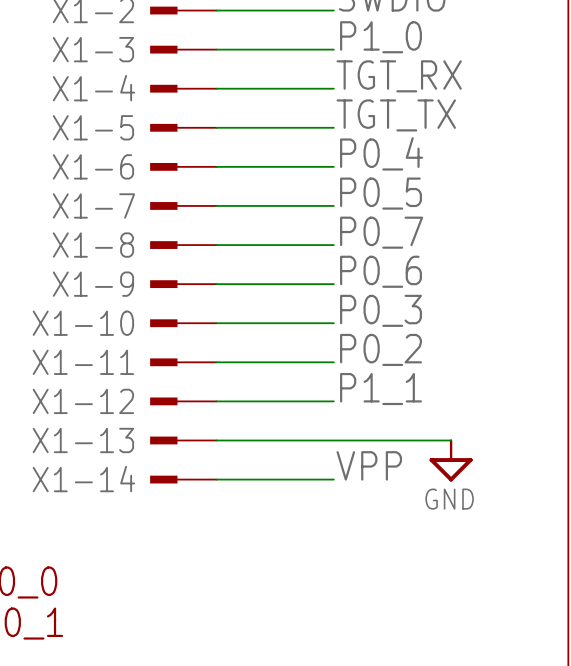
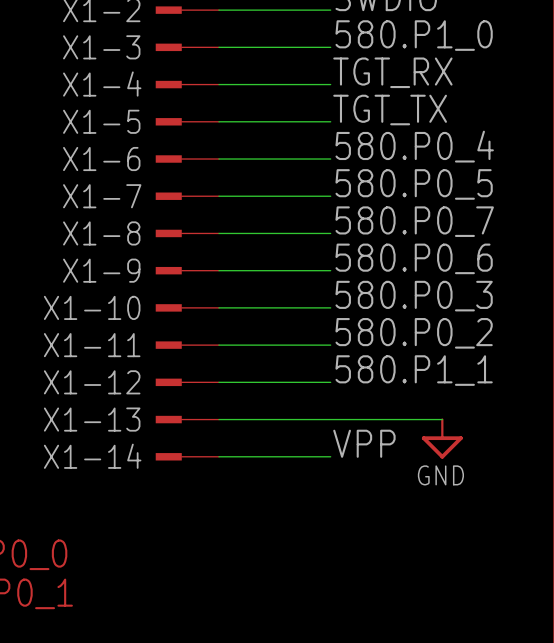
label: P1_0 (381, 37) -> 580.P1_0 (414, 35)
label: P0_4 (381, 153) -> 580.P0_4 (414, 146)
label: P0_5 (381, 193) -> 580.P0_5 (414, 184)
label: P0_7 (381, 232) -> 580.P0_7 (414, 221)
label: P0_6 (381, 271) -> 580.P0_6 (414, 258)
label: P0_3 (381, 310) -> 580.P0_3 (414, 296)
label: P0_2 (381, 349) -> 580.P0_2 (414, 333)
label: P1_1 (381, 389) -> 580.P1_1 (414, 370)

